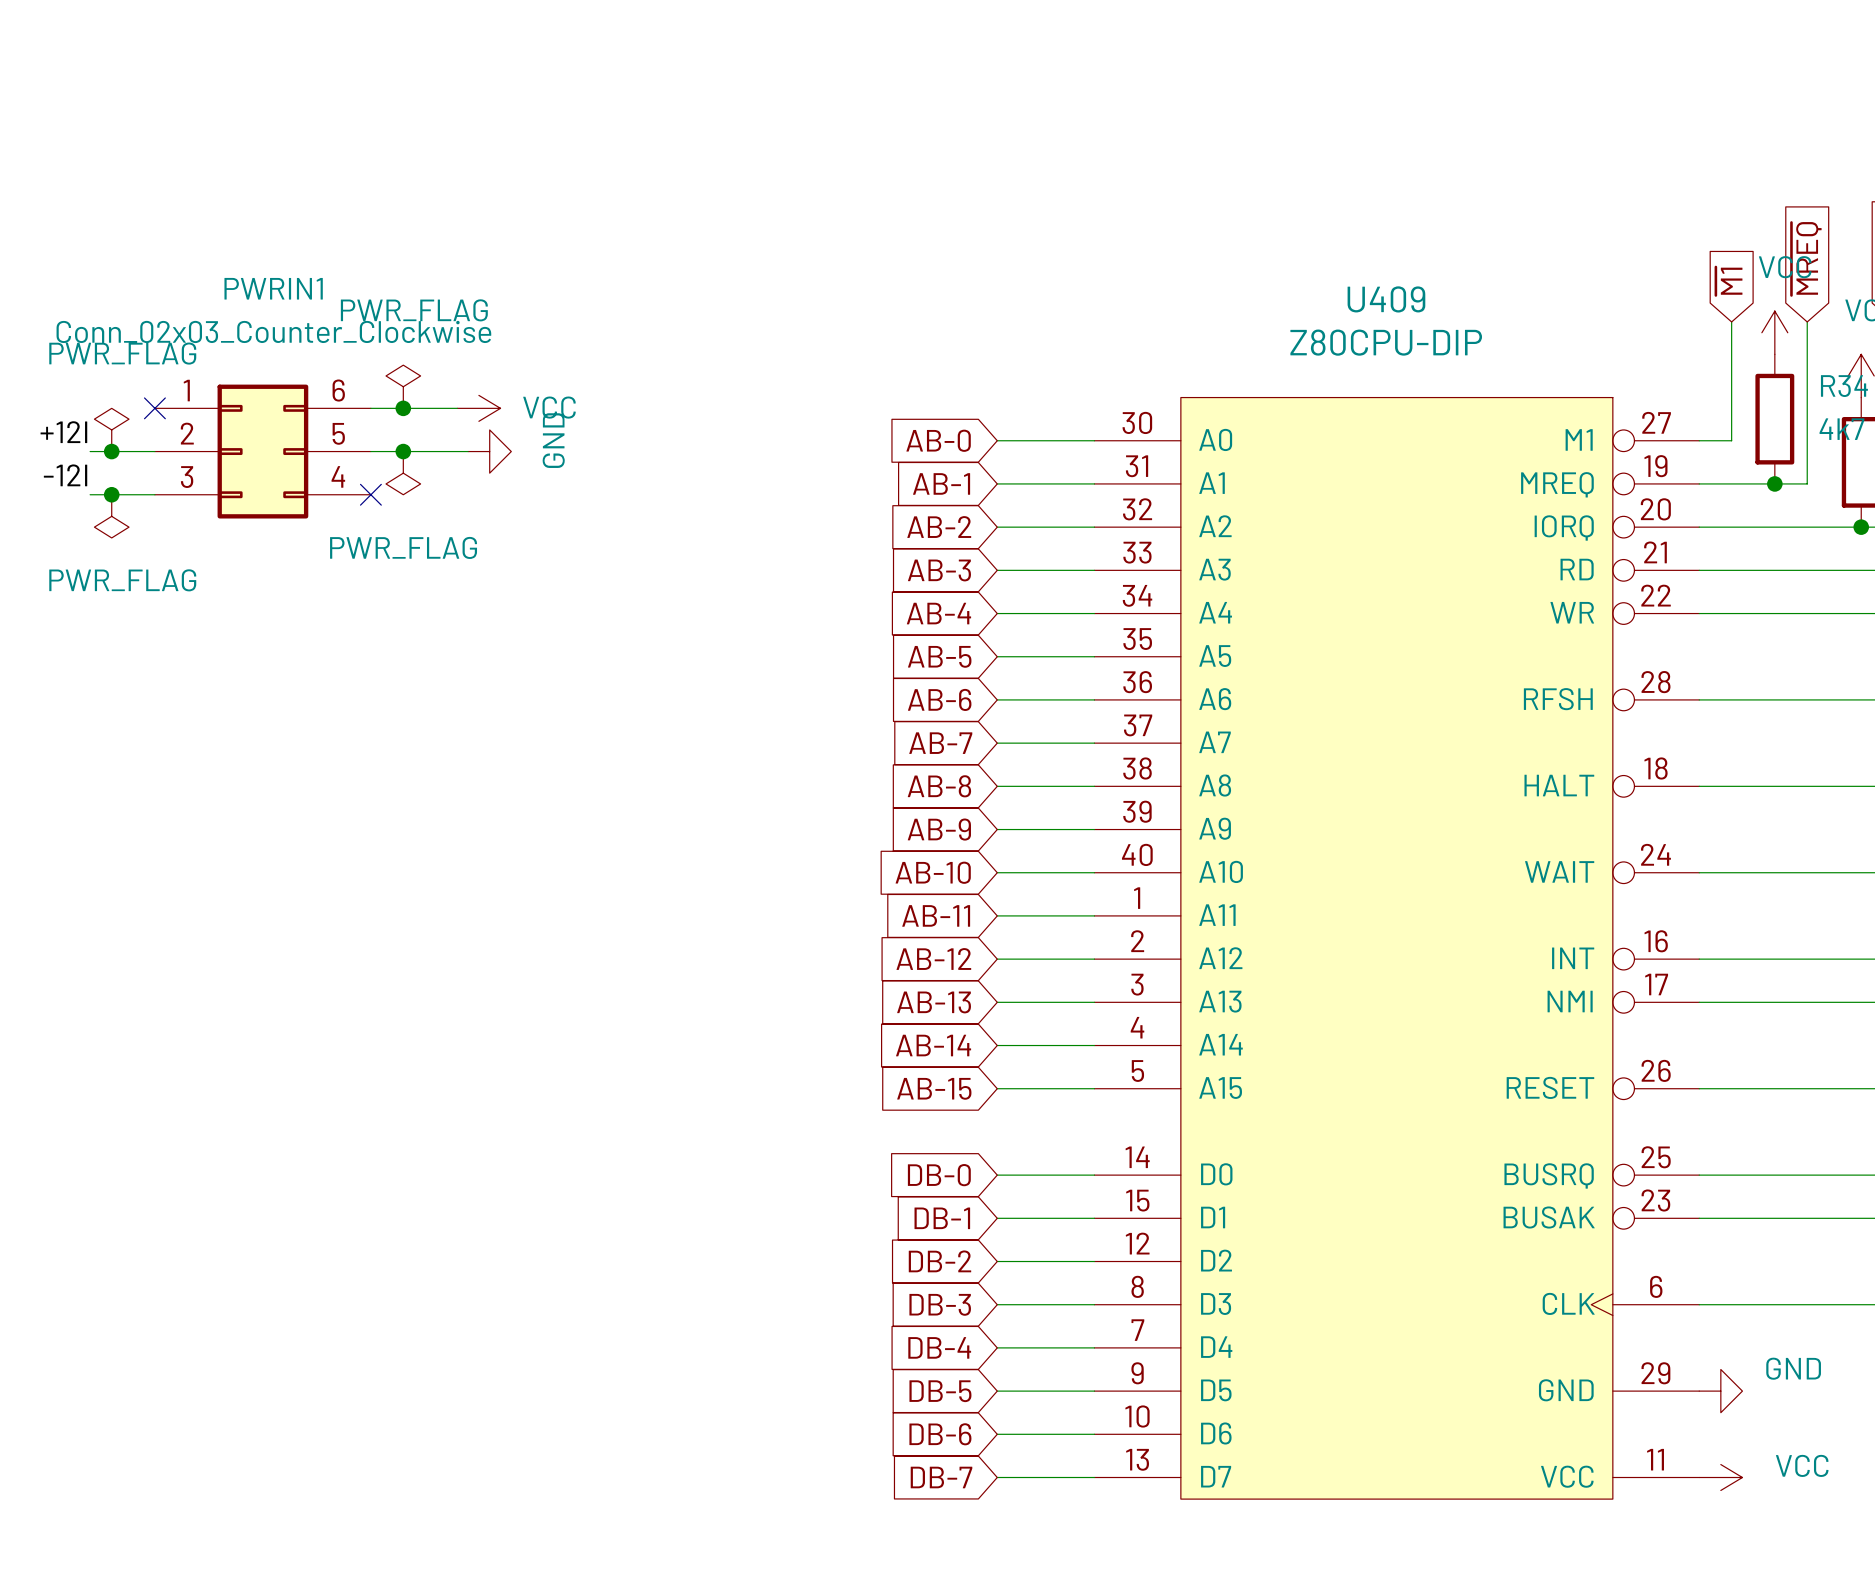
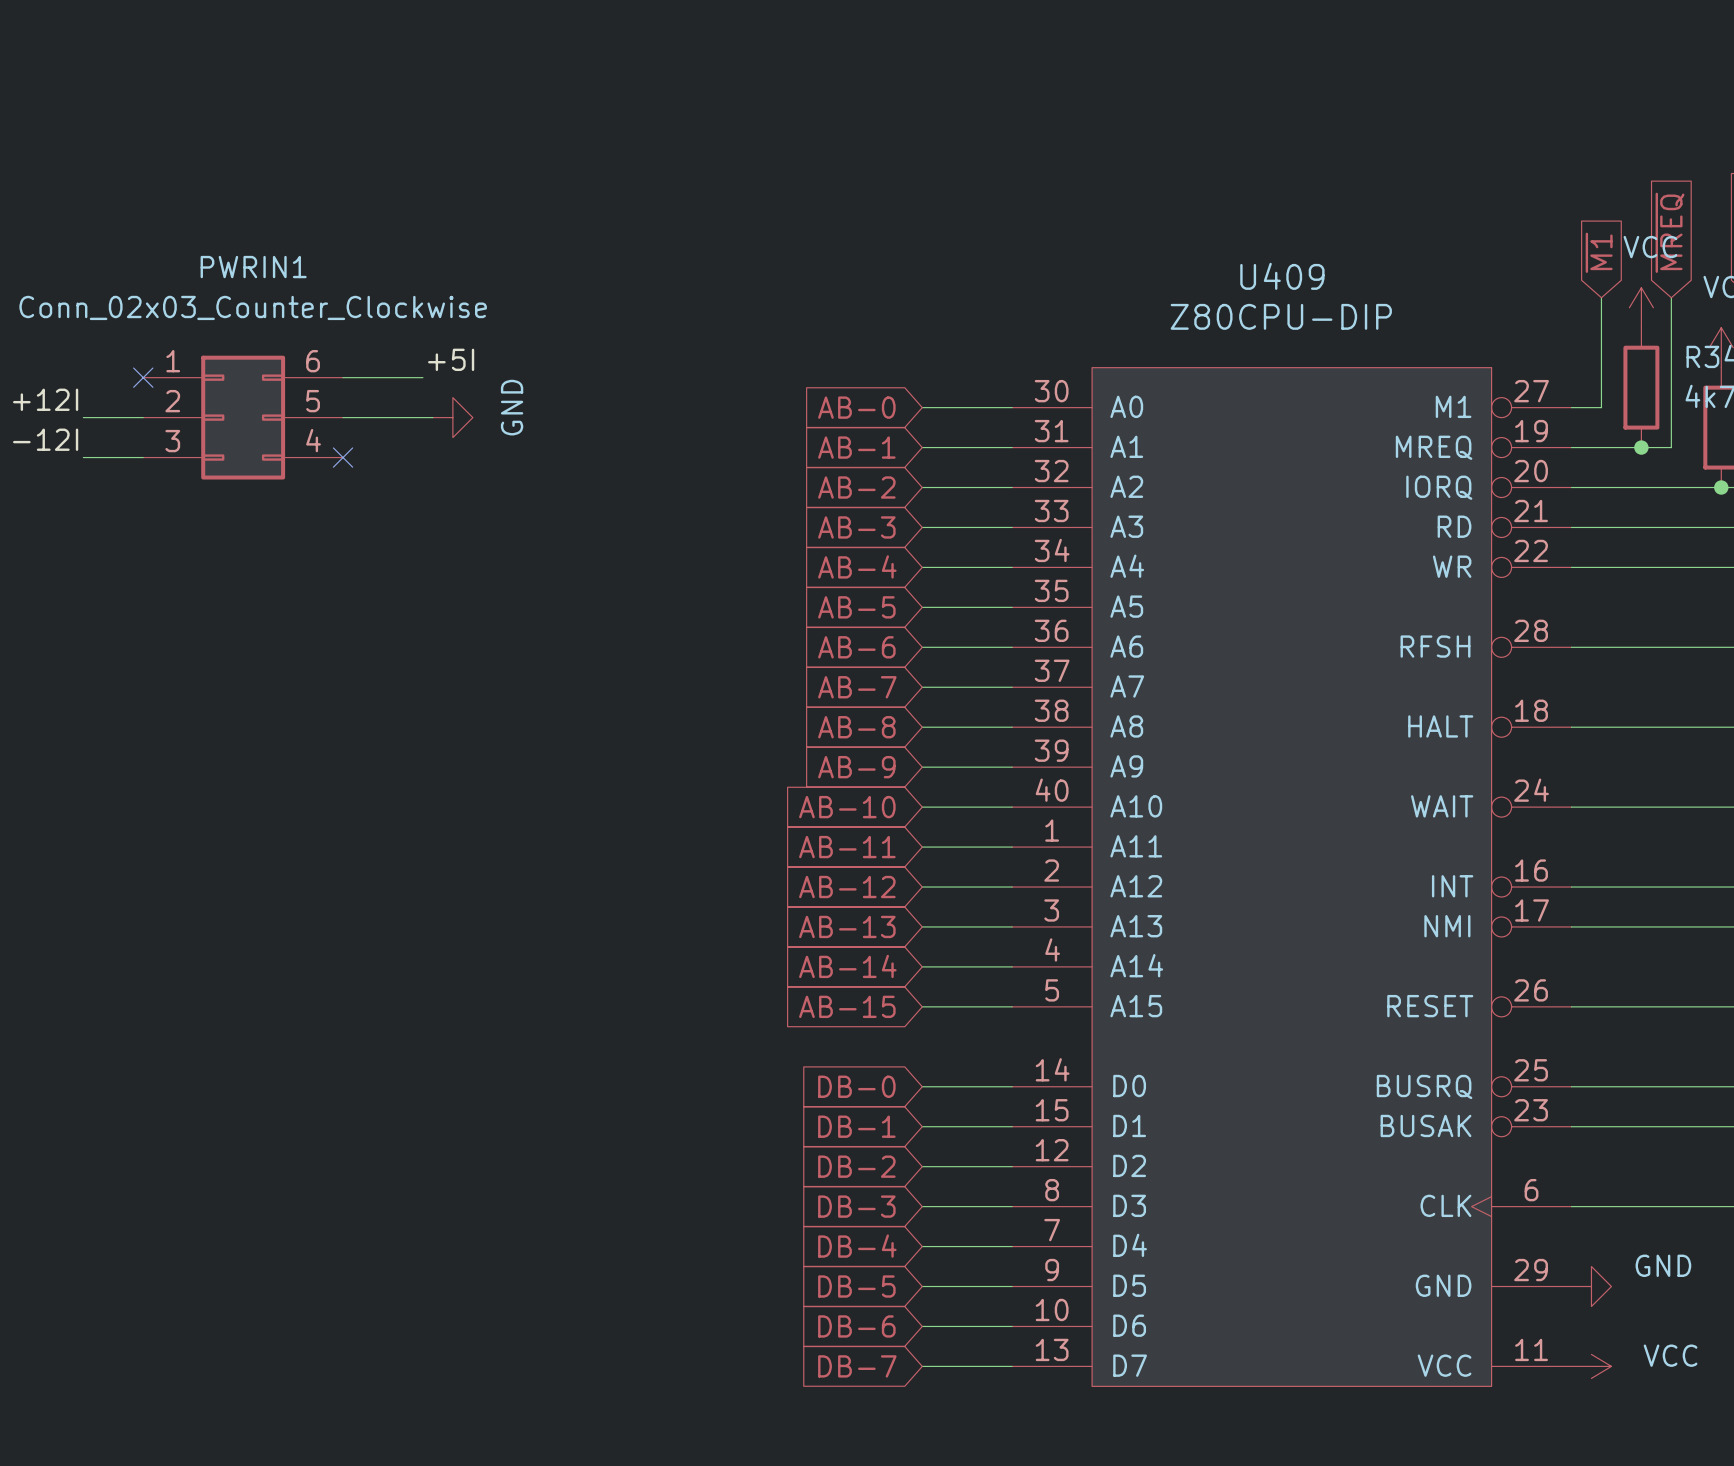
power symbol: PWR_FLAG (403, 386) -> none
label: none -> +5I (451, 359)
junction: (403, 408) -> none
power symbol: VCC (478, 408) -> none
power symbol: PWR_FLAG (111, 429) -> none
junction: (111, 451) -> none
junction: (403, 451) -> none
power symbol: PWR_FLAG (403, 473) -> none
junction: (111, 494) -> none
power symbol: PWR_FLAG (111, 516) -> none

